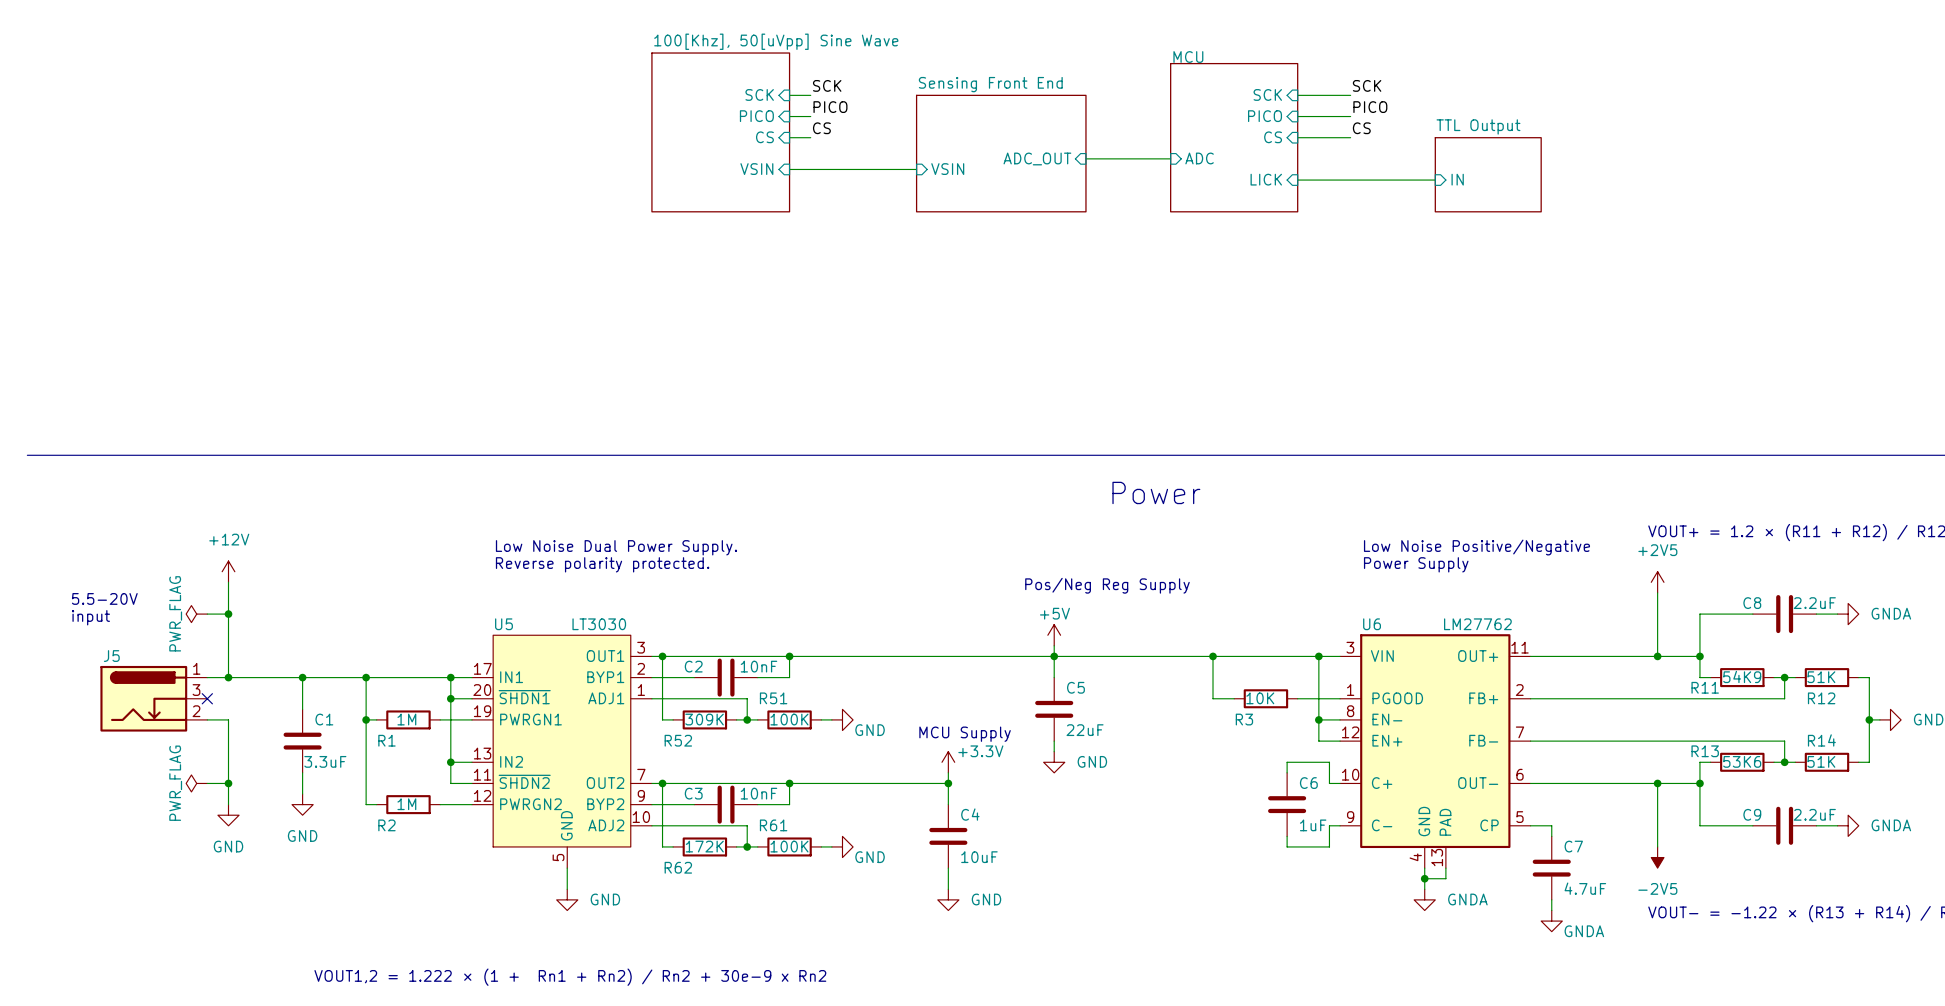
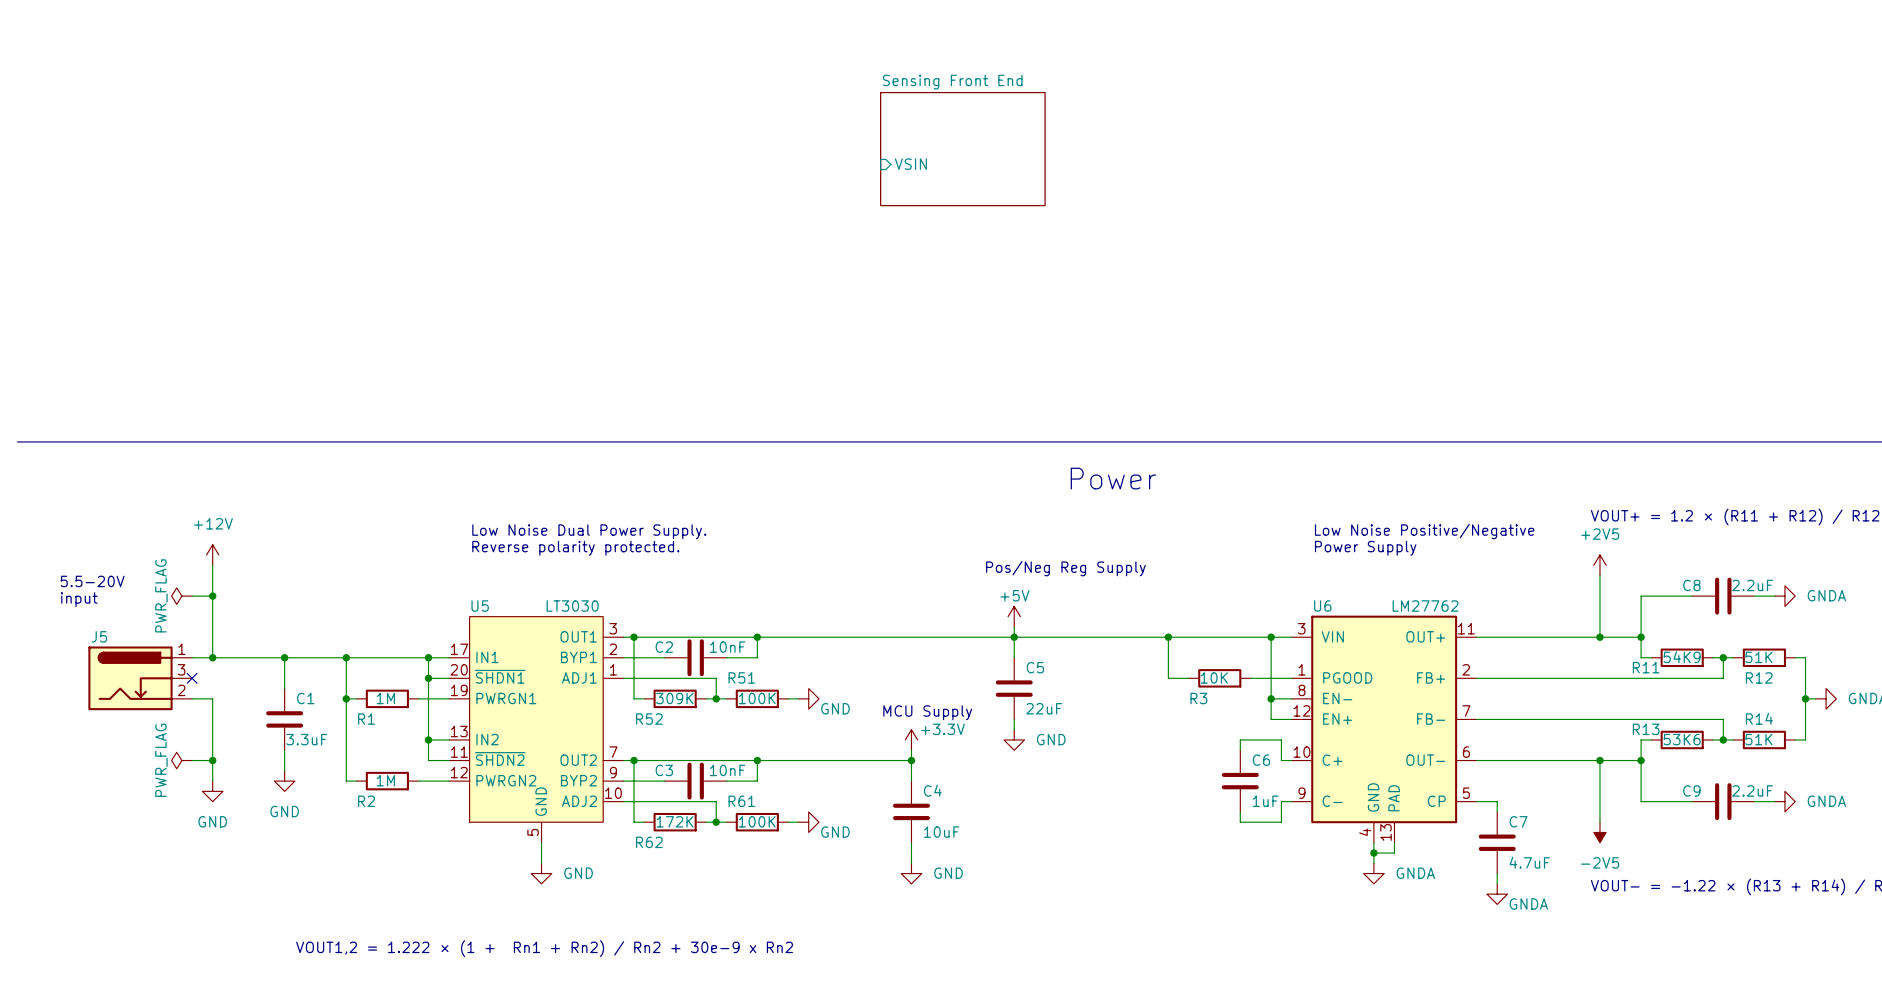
label: SCK (827, 85) -> none
label: SCK (1367, 85) -> none
sheet pin: SCK (759, 94) -> none
sheet pin: SCK (1267, 94) -> none
wire: (789, 95) (810, 95) -> none
wire: (1297, 95) (1350, 95) -> none
label: PICO (830, 107) -> none
label: PICO (1370, 107) -> none
sheet pin: PICO (756, 116) -> none
wire: (789, 116) (810, 116) -> none
sheet pin: PICO (1265, 116) -> none
wire: (1297, 116) (1350, 116) -> none
label: CS (821, 128) -> none
label: CS (1361, 128) -> none
sheet 100[Khz], 50[uVpp] Sine Wave: (720, 132) -> none
sheet pin: CS (764, 137) -> none
wire: (789, 137) (810, 137) -> none
sheet MCU: (1234, 137) -> none
sheet pin: CS (1273, 137) -> none
wire: (1297, 137) (1350, 137) -> none
sheet pin: ADC_OUT (1037, 158) -> none
wire: (1085, 158) (1170, 158) -> none
sheet pin: ADC (1199, 158) -> none
sheet pin: VSIN (756, 169) -> none
wire: (789, 169) (916, 169) -> none
sheet TTL Output: (1488, 174) -> none
sheet pin: LICK (1266, 179) -> none
sheet pin: IN (1457, 179) -> none
wire: (1297, 180) (1435, 180) -> none

